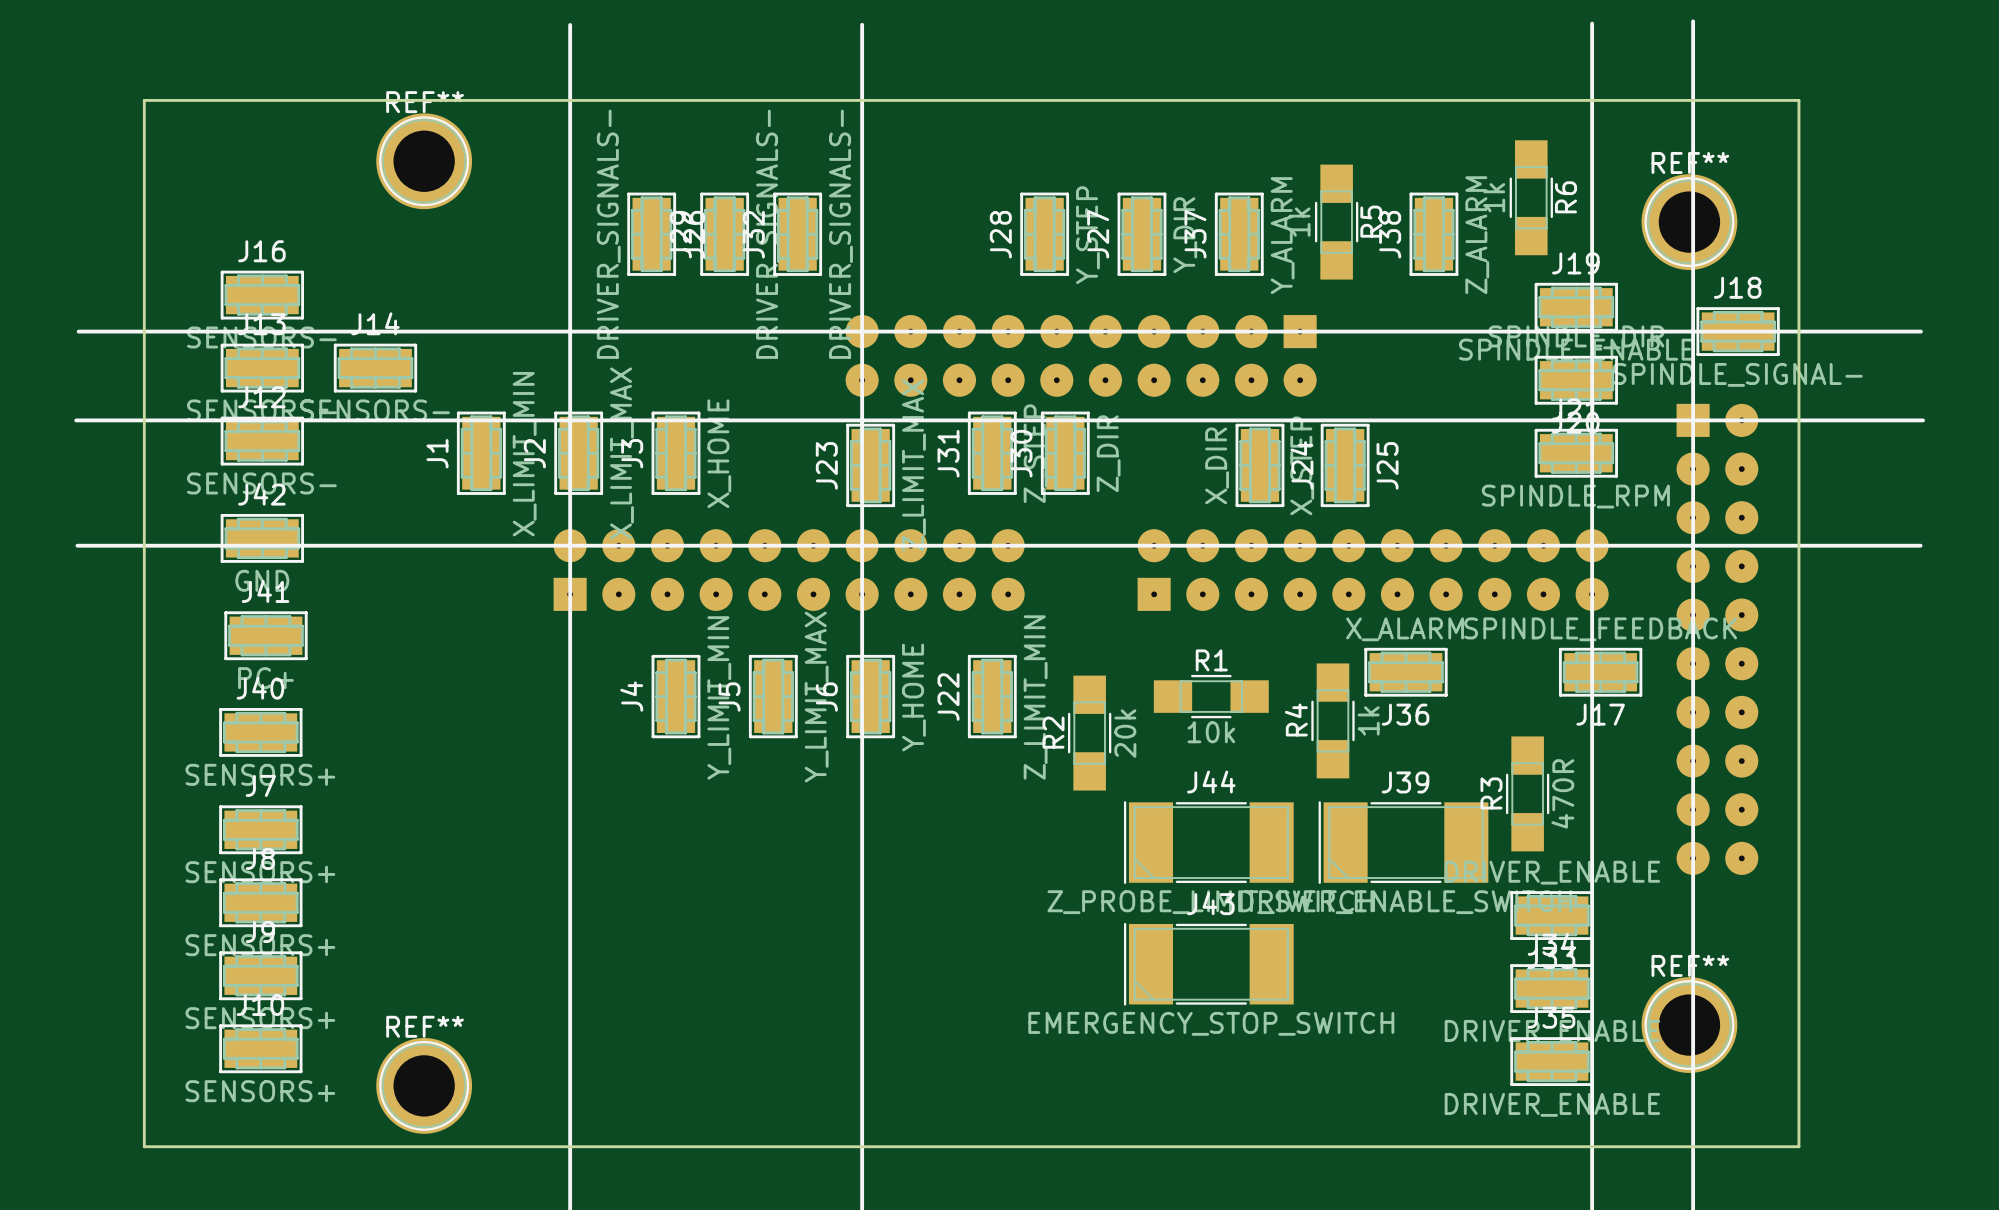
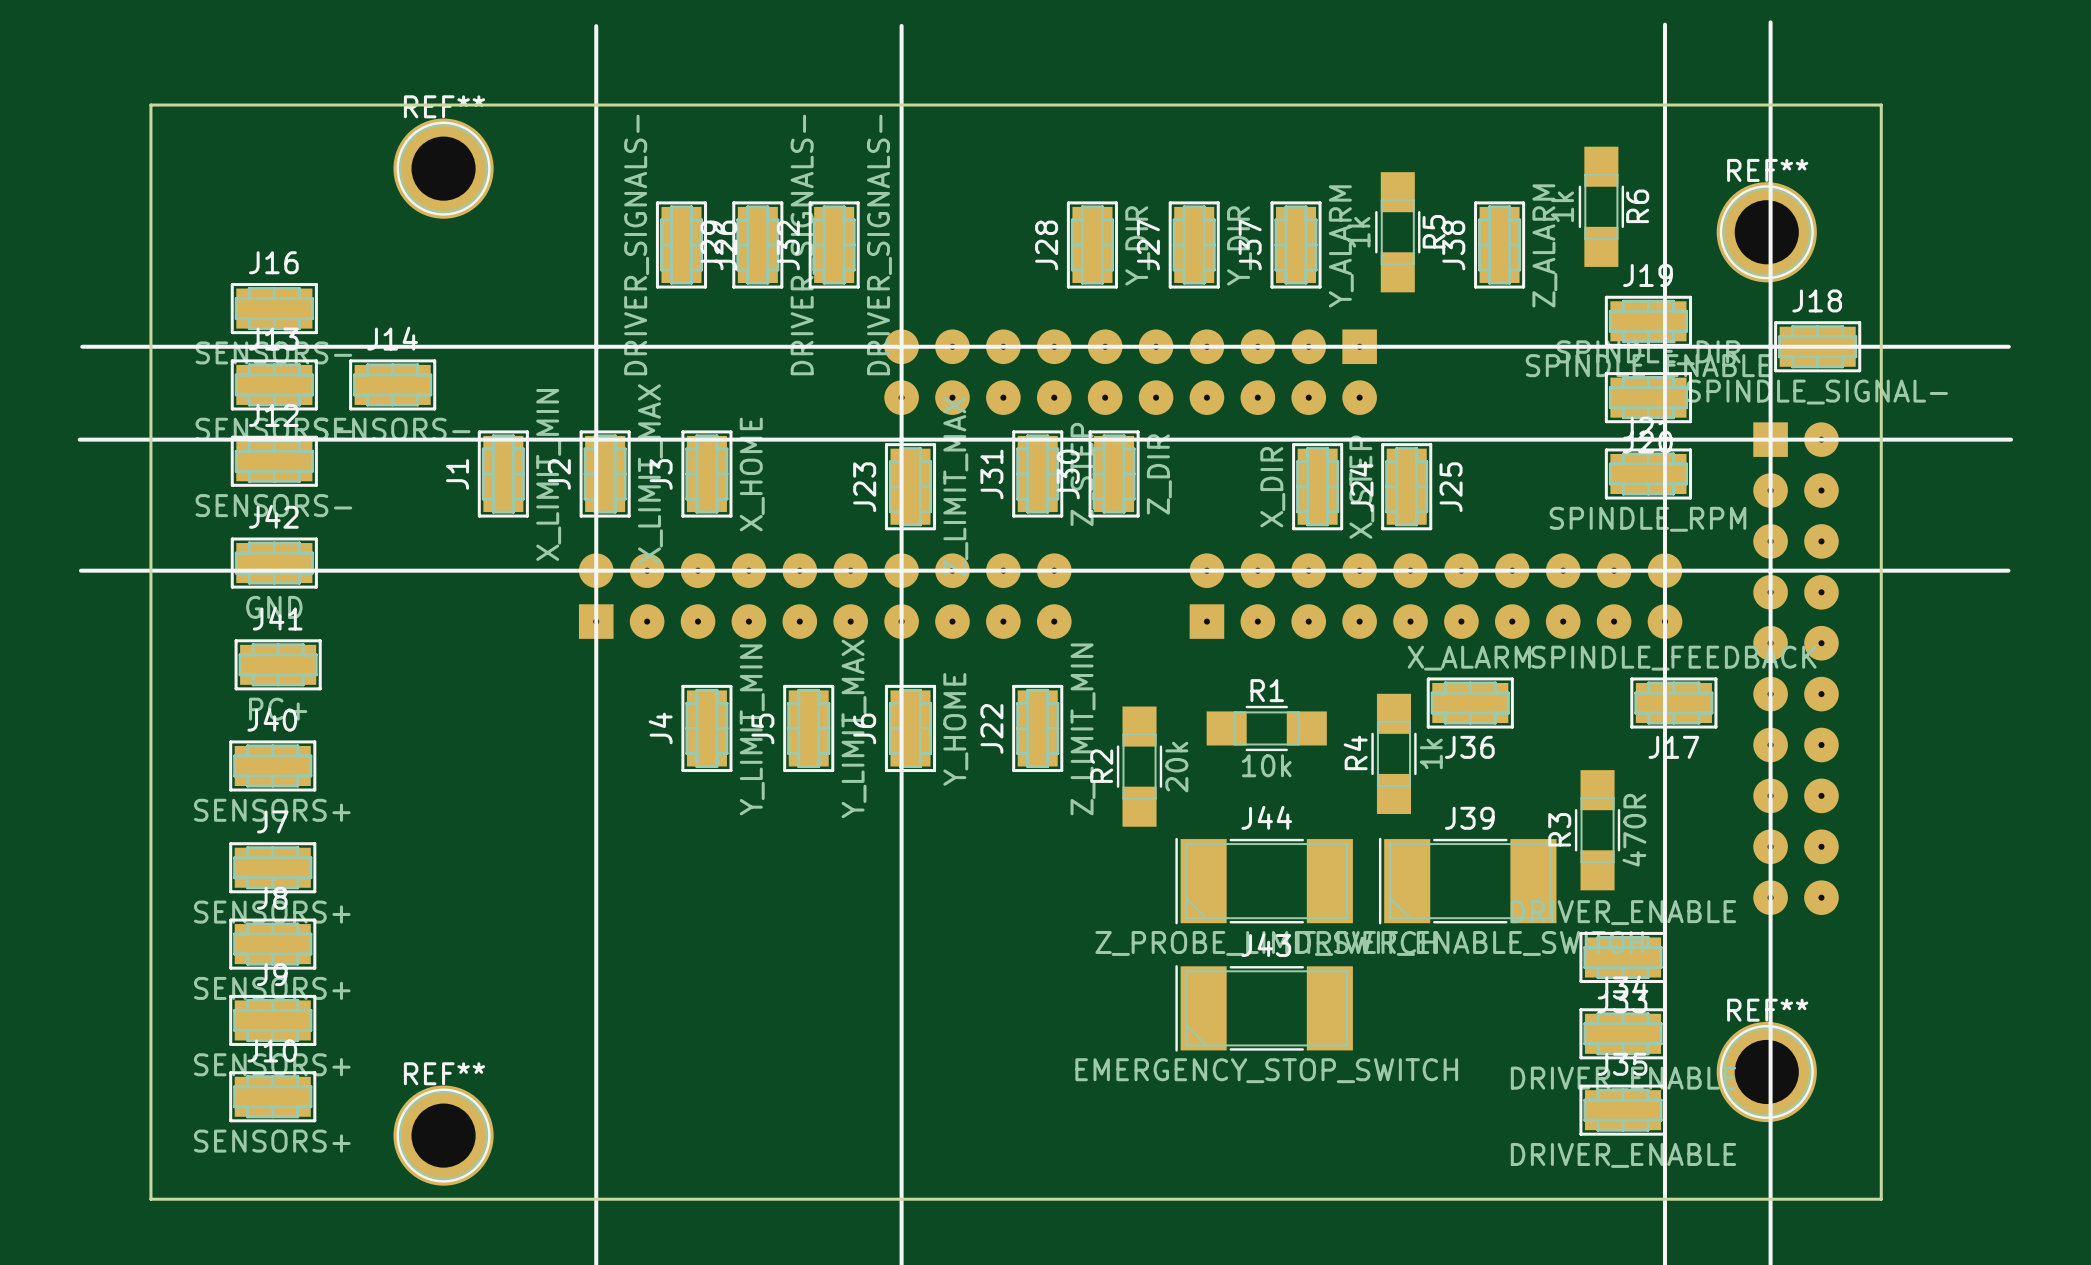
J28 value: Y_STEP (1087, 235) -> Y_DIR (1137, 245)

